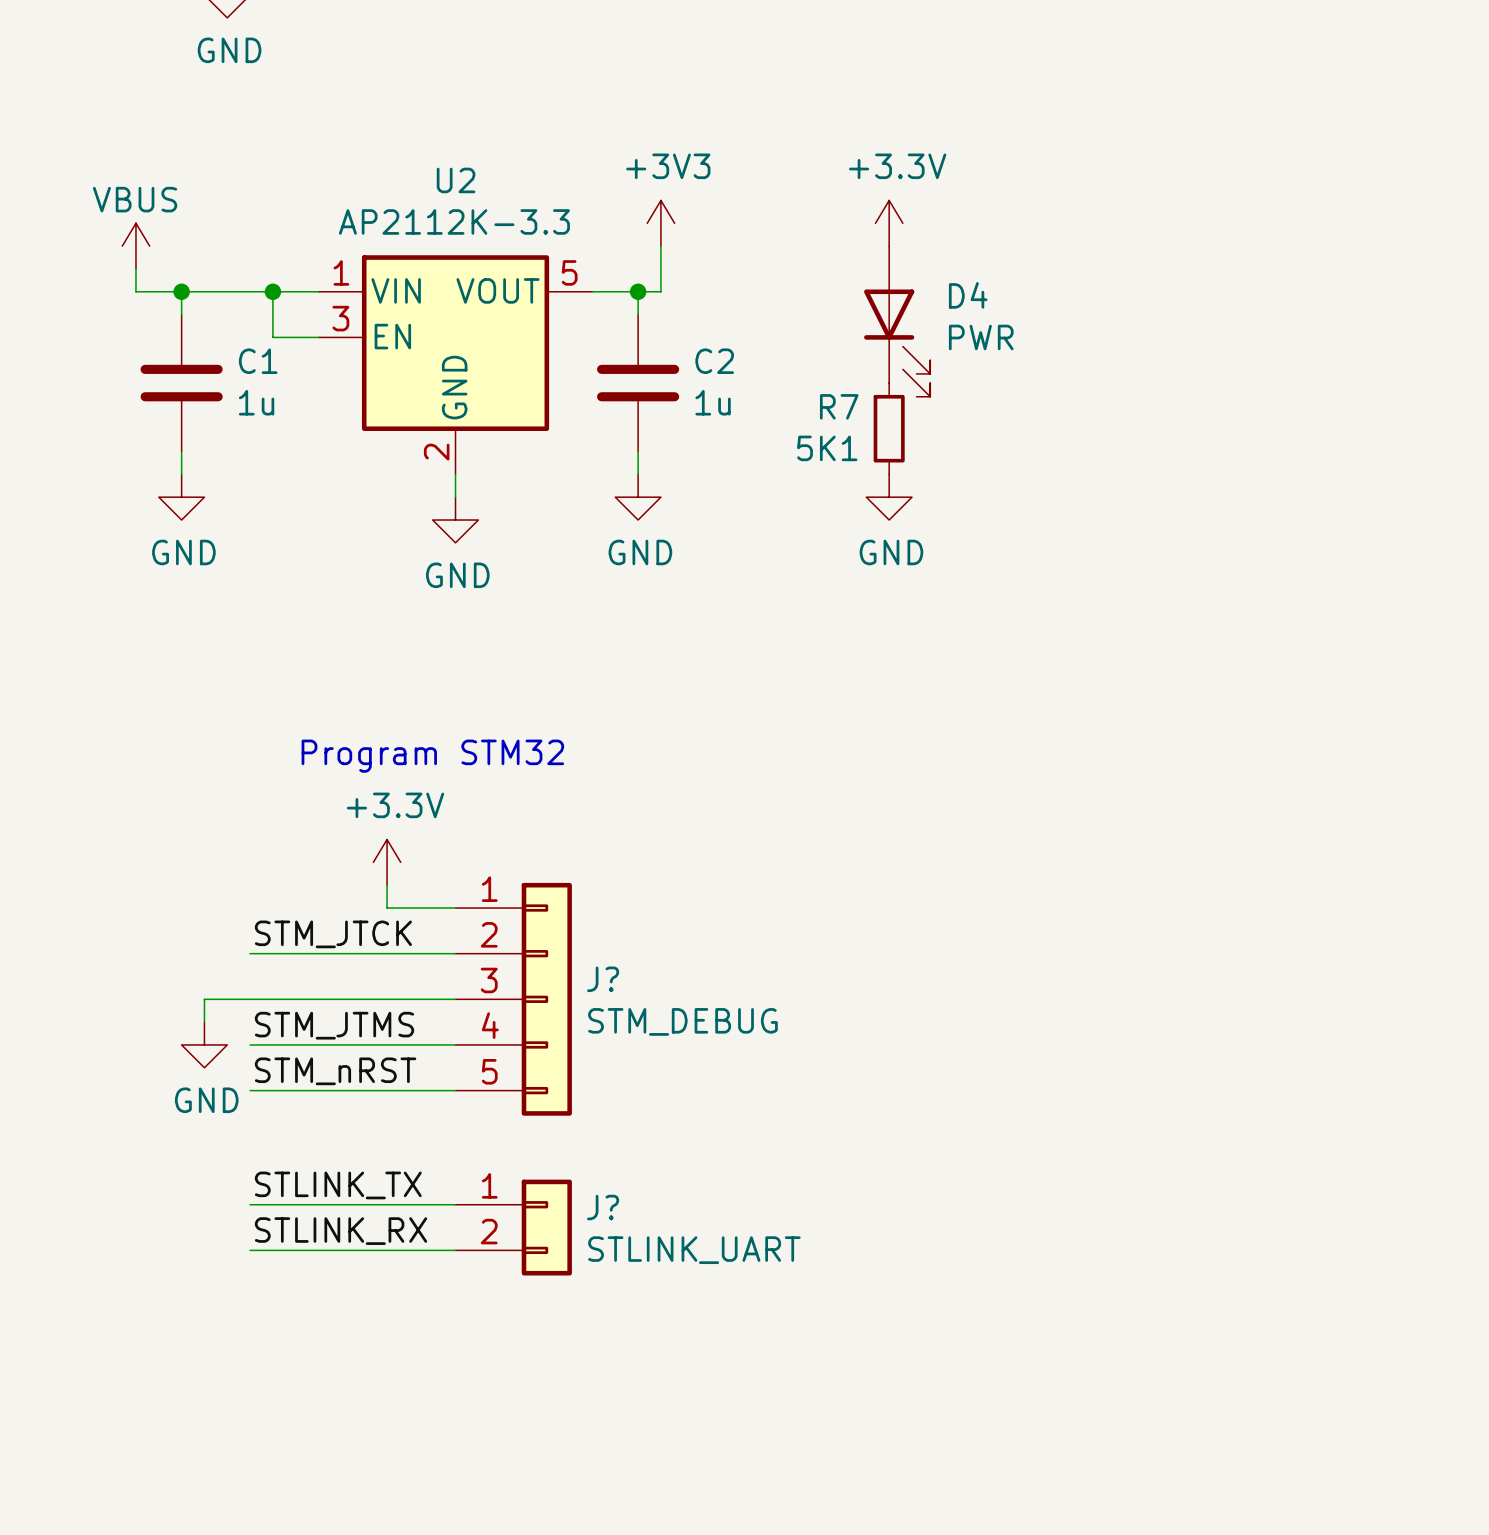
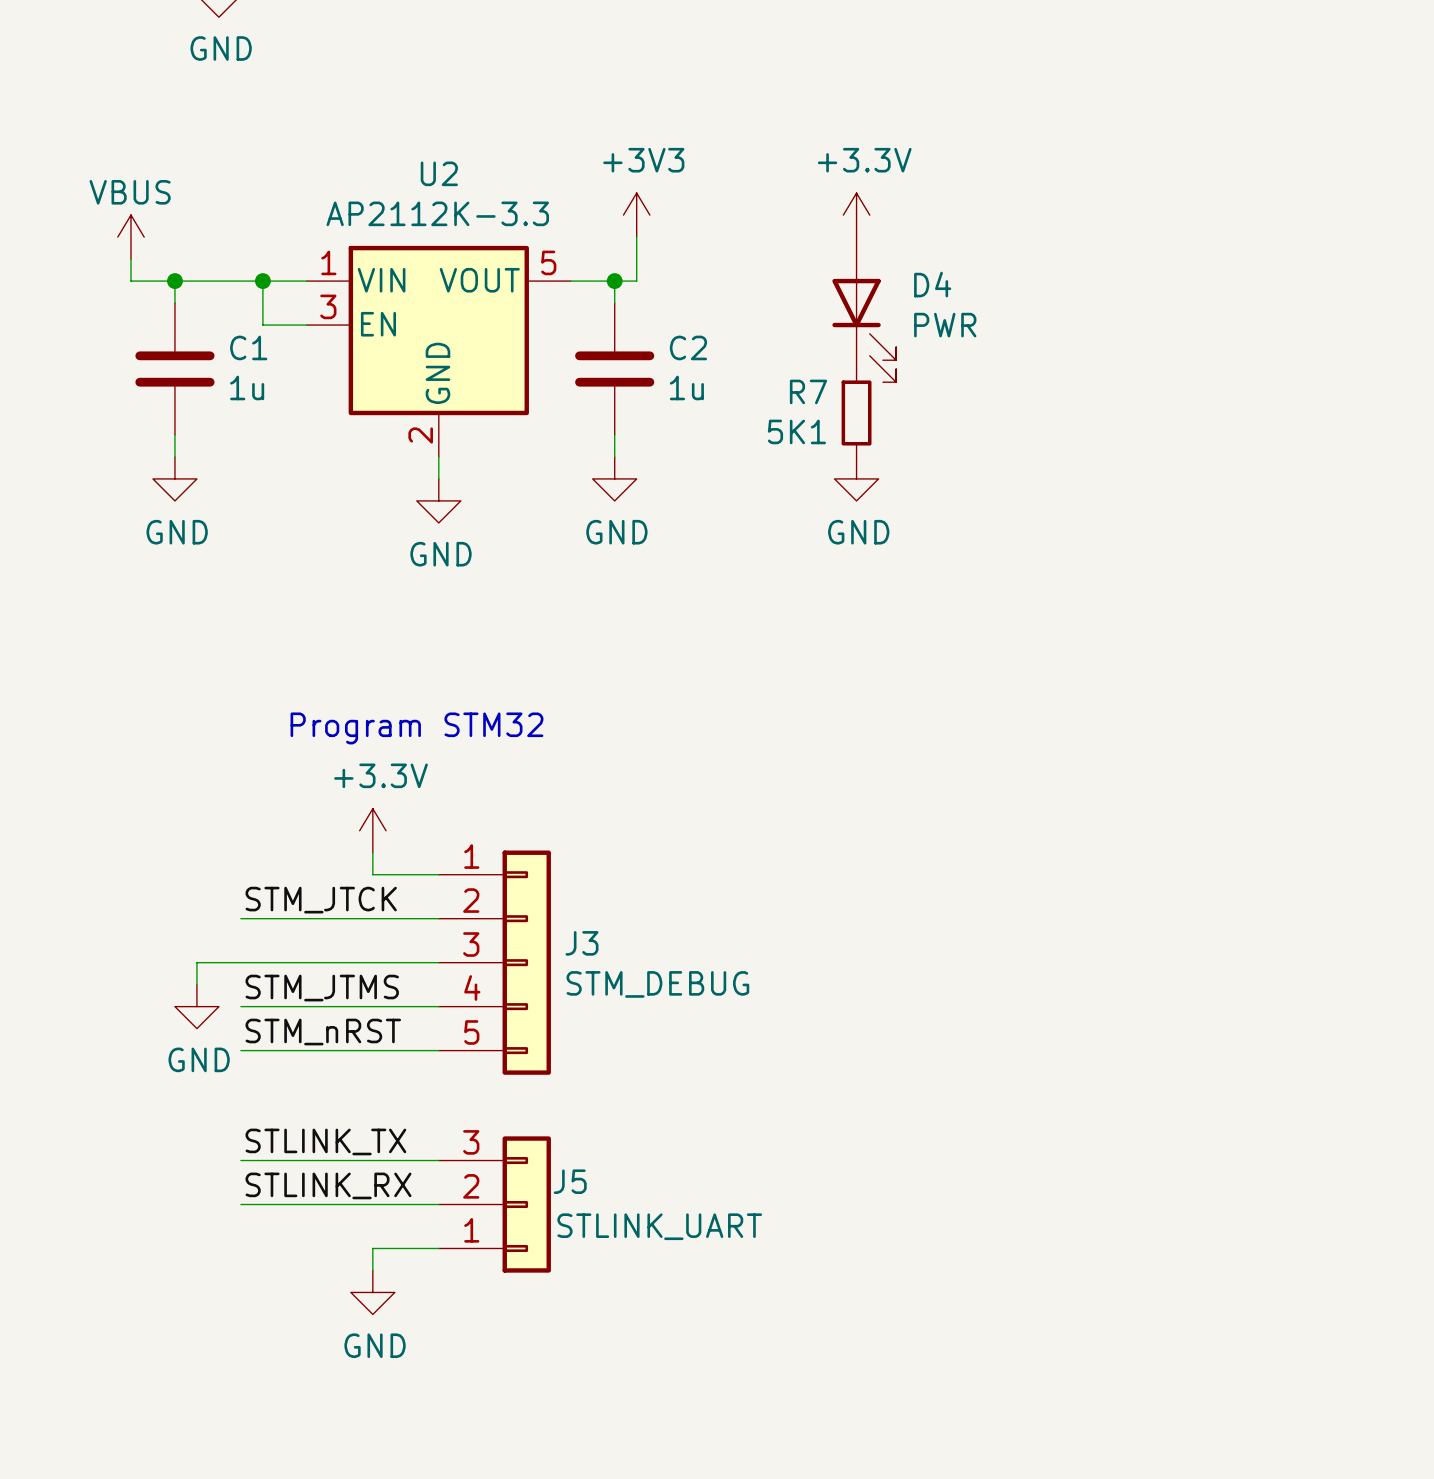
J? name: J? (603, 979) -> J3 (581, 943)
J?: STLINK_UART (513, 1227) -> none
J5: none -> STLINK_UART (494, 1204)
wire: none -> (438, 1248) (372, 1248) (372, 1270)
power symbol: none -> GND (372, 1292)

